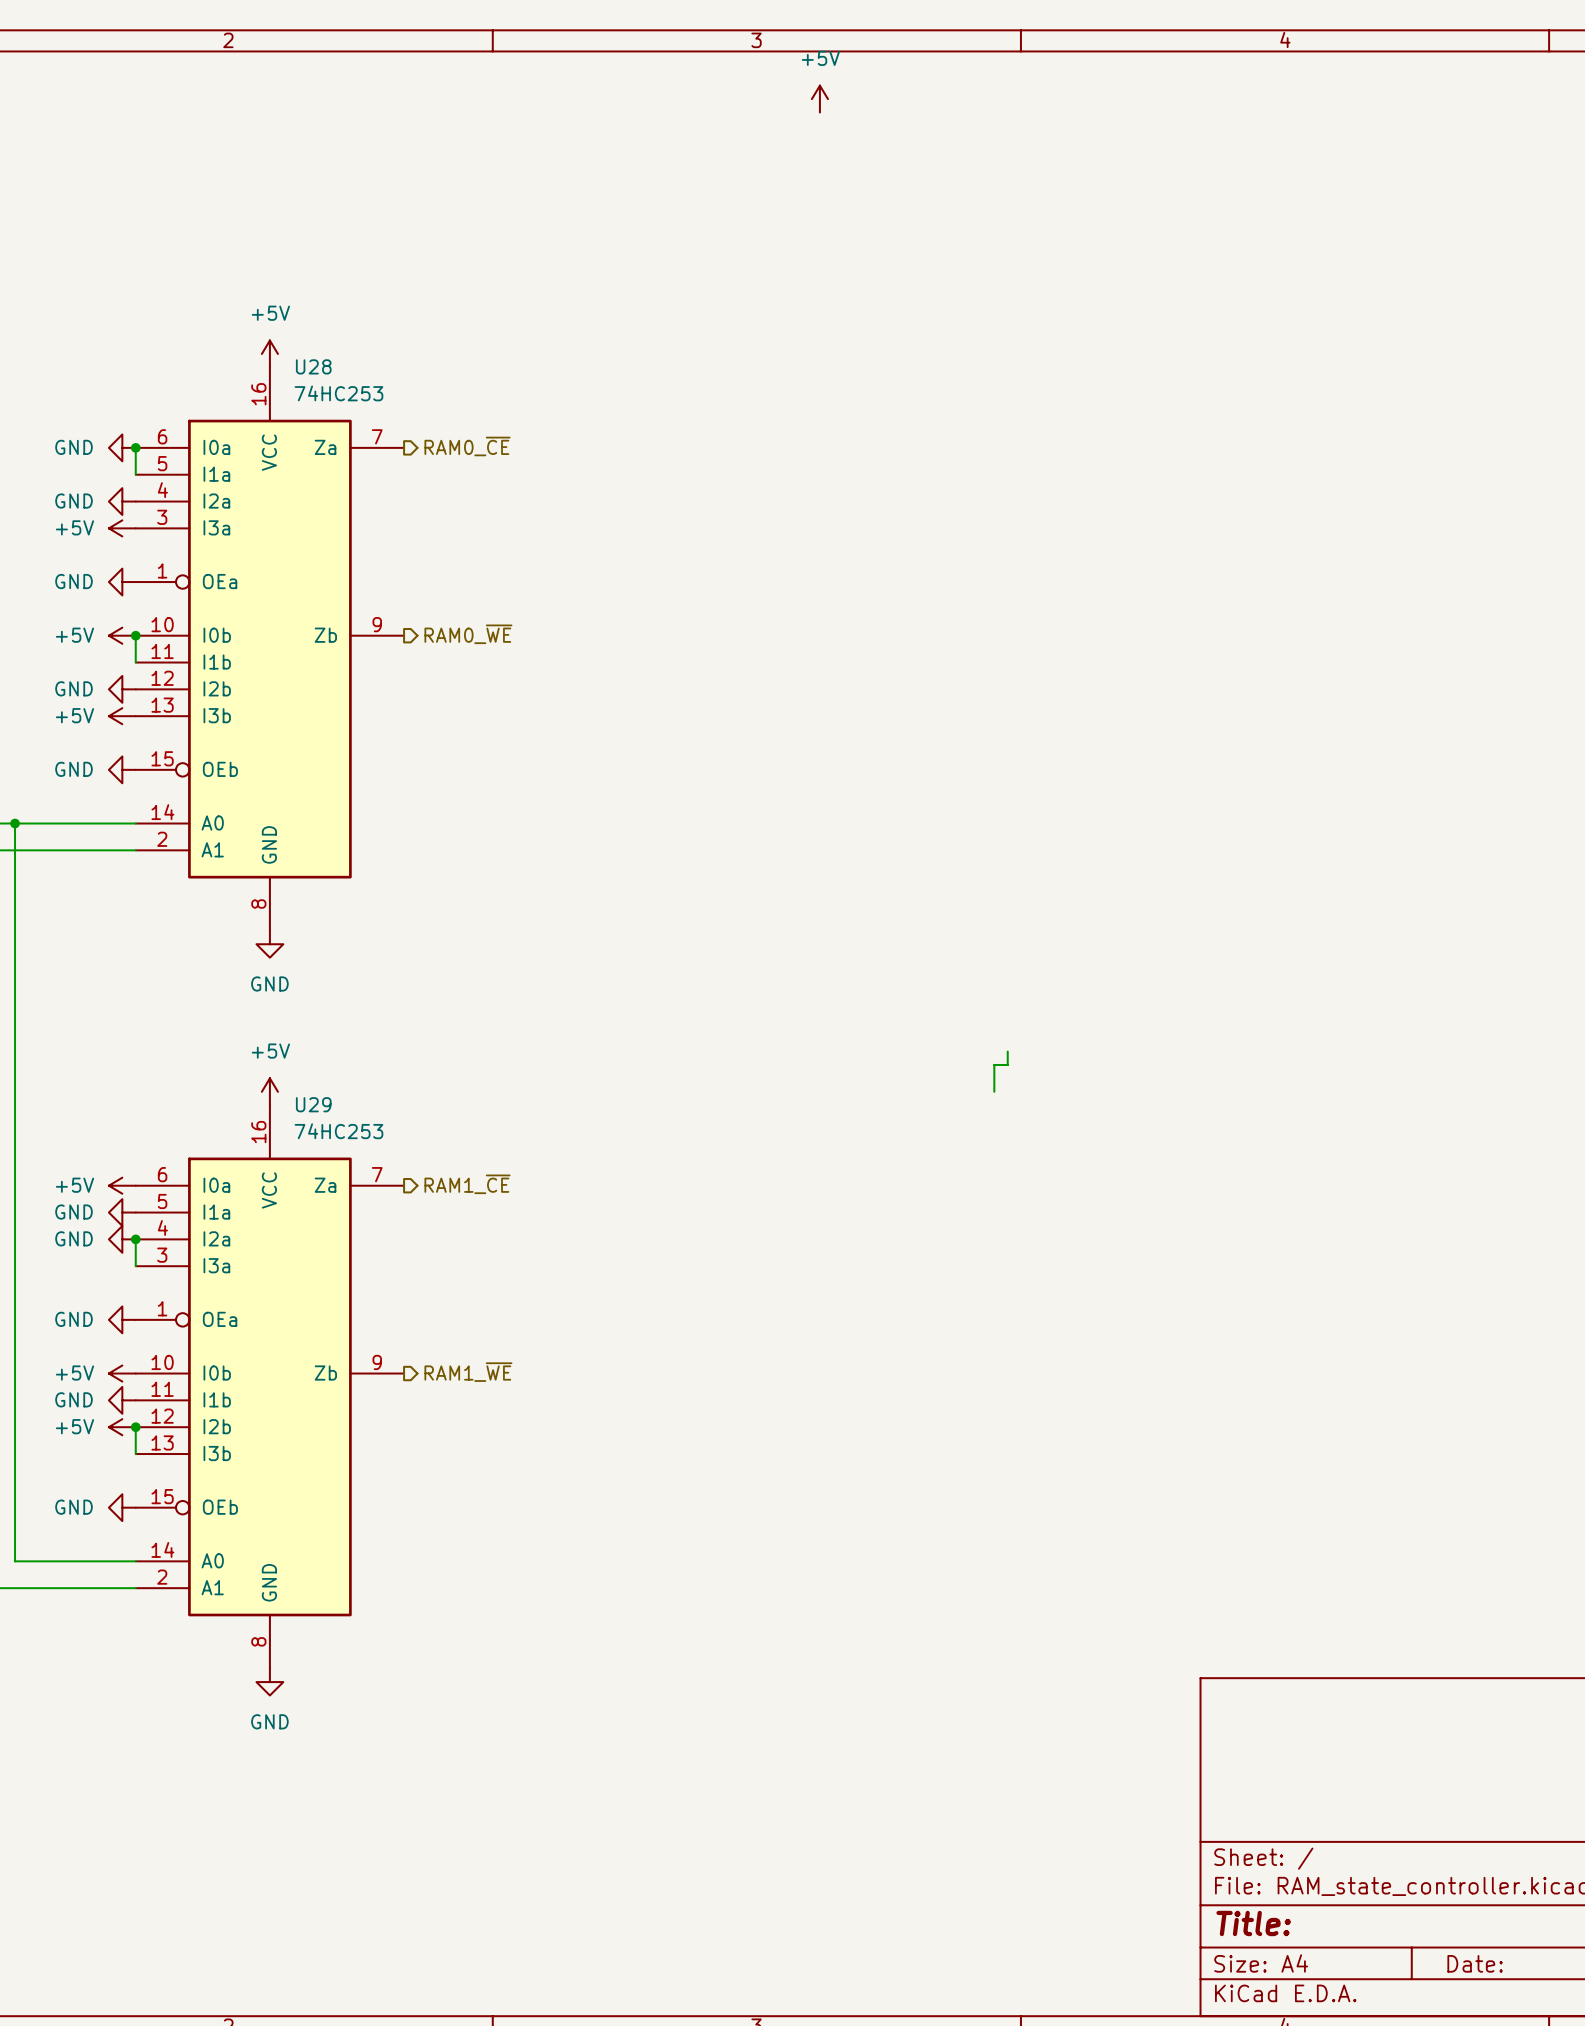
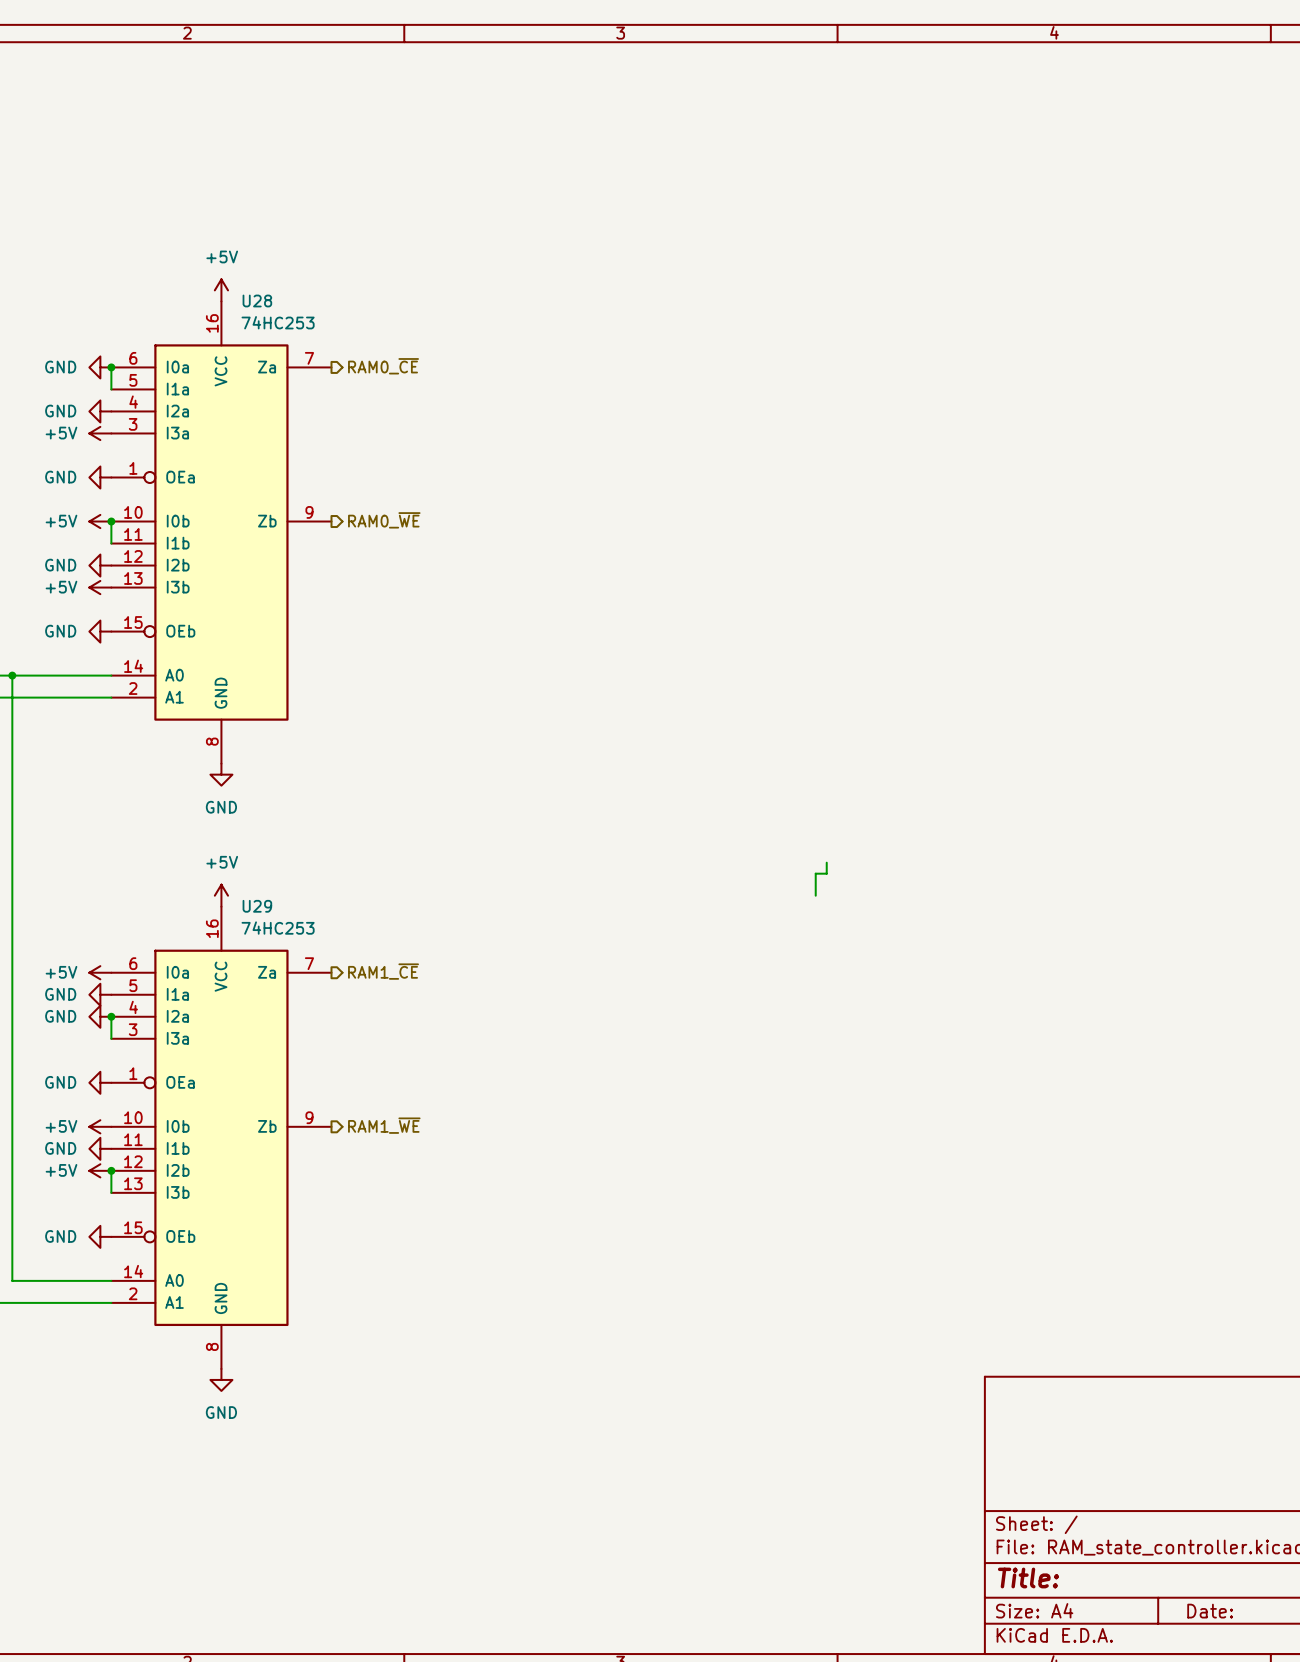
power symbol: +5V (819, 99) -> none

